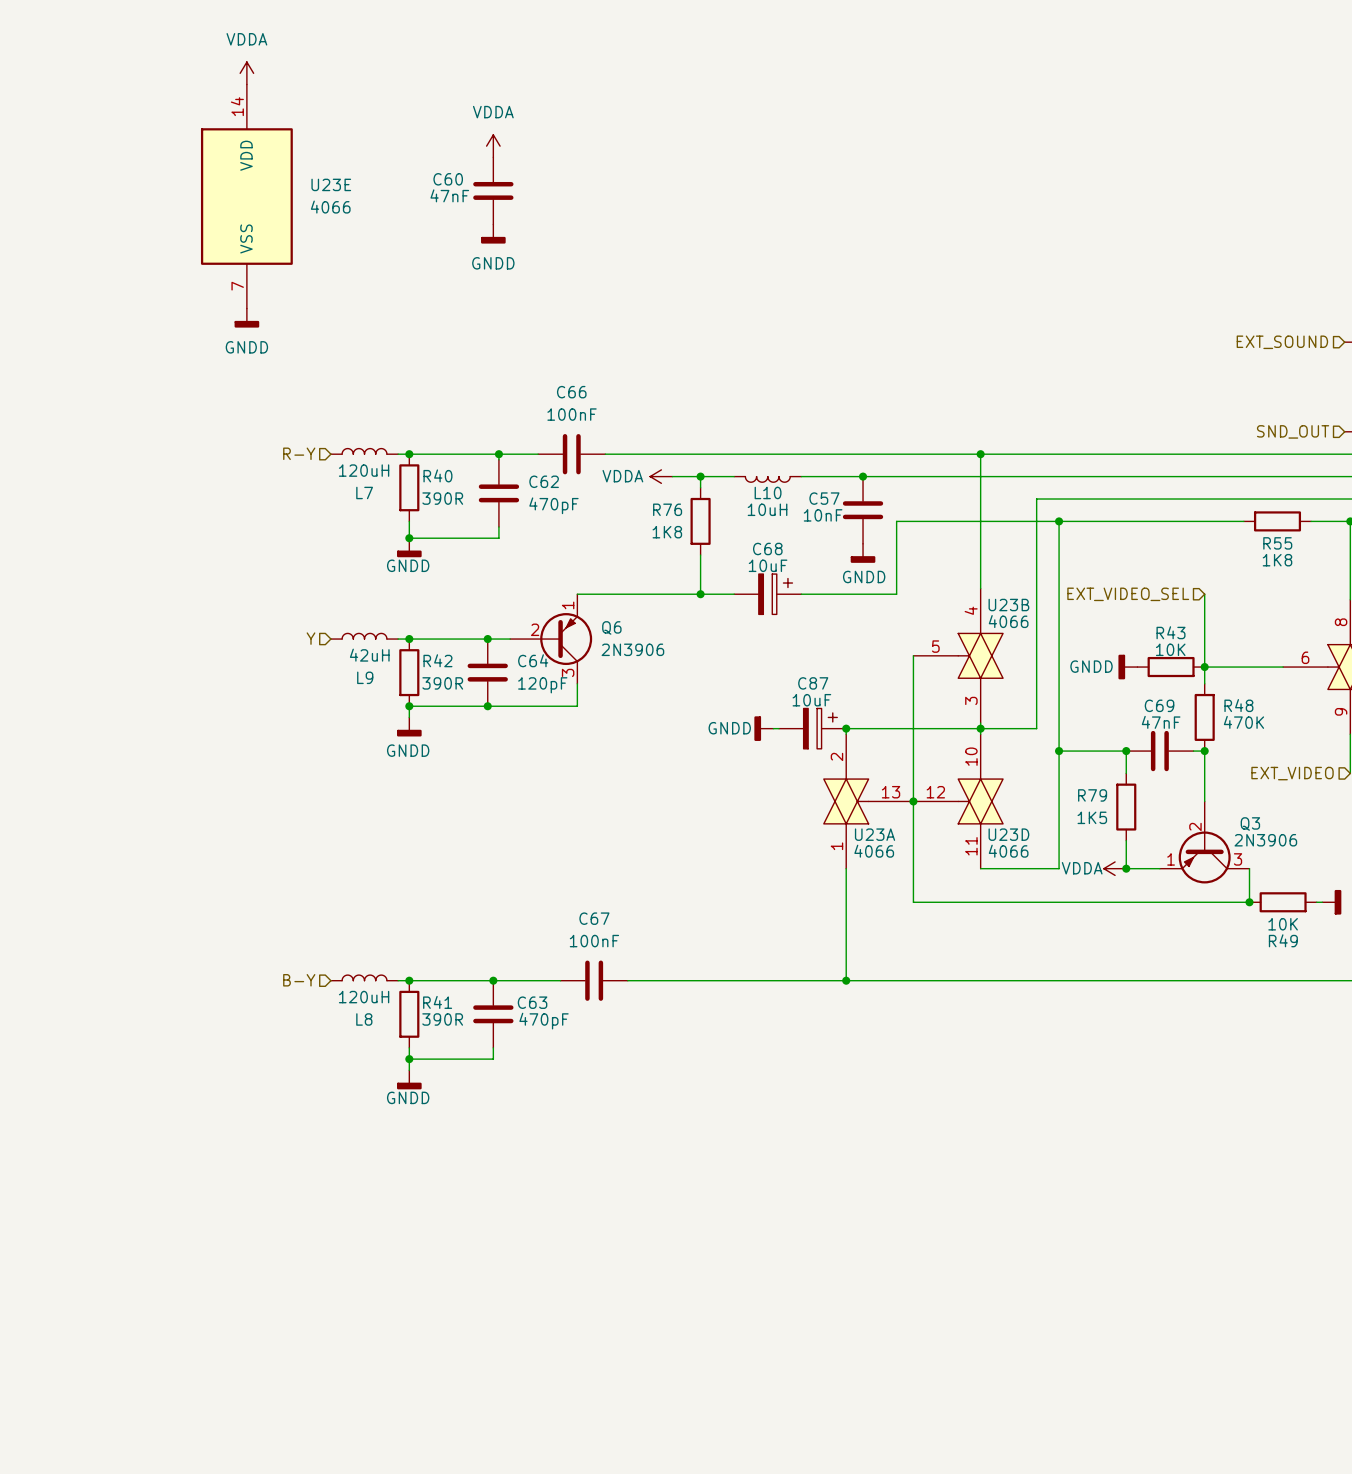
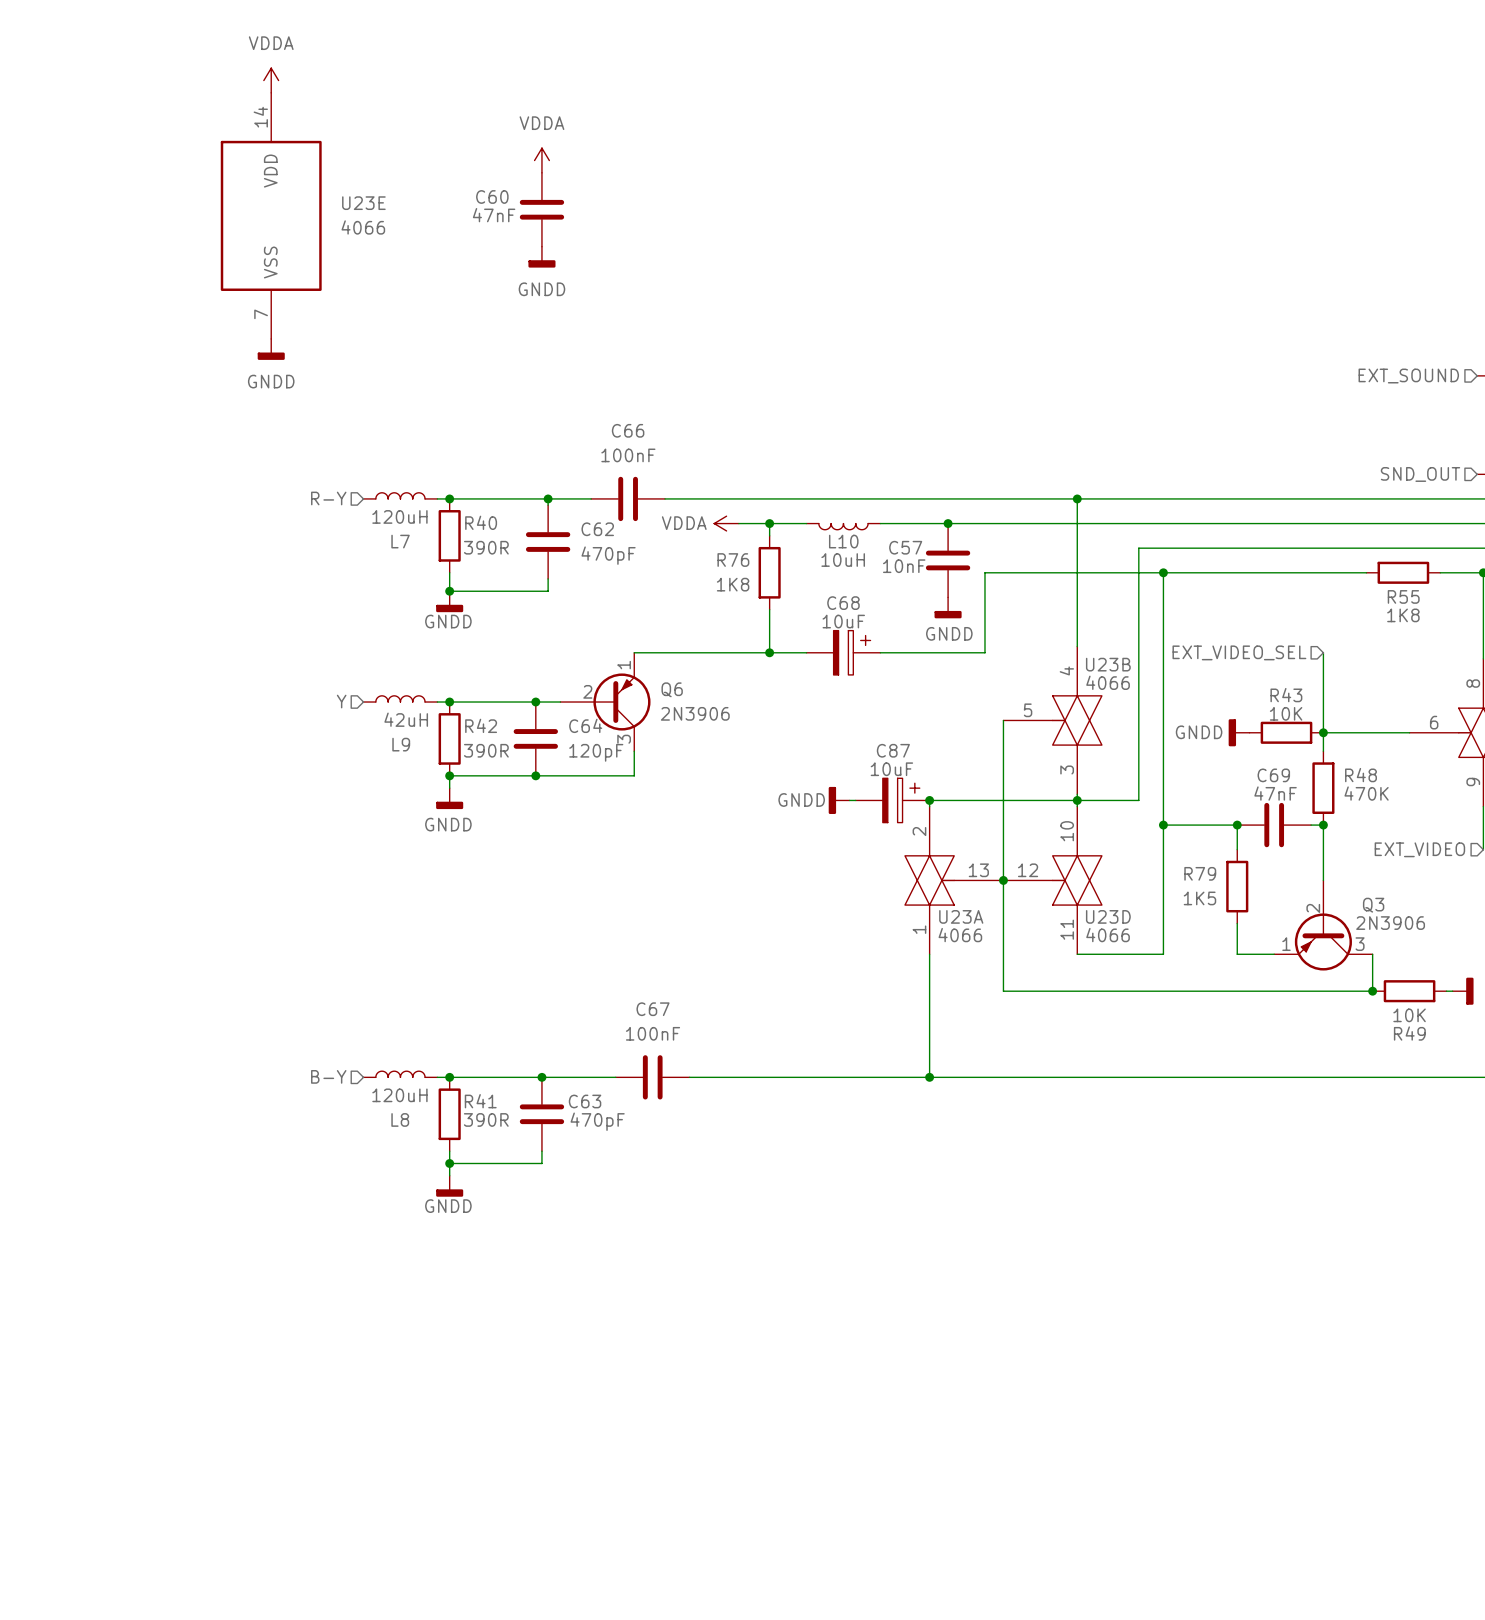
power symbol: VDDA (1115, 868) -> none
junction: (1126, 868) -> none

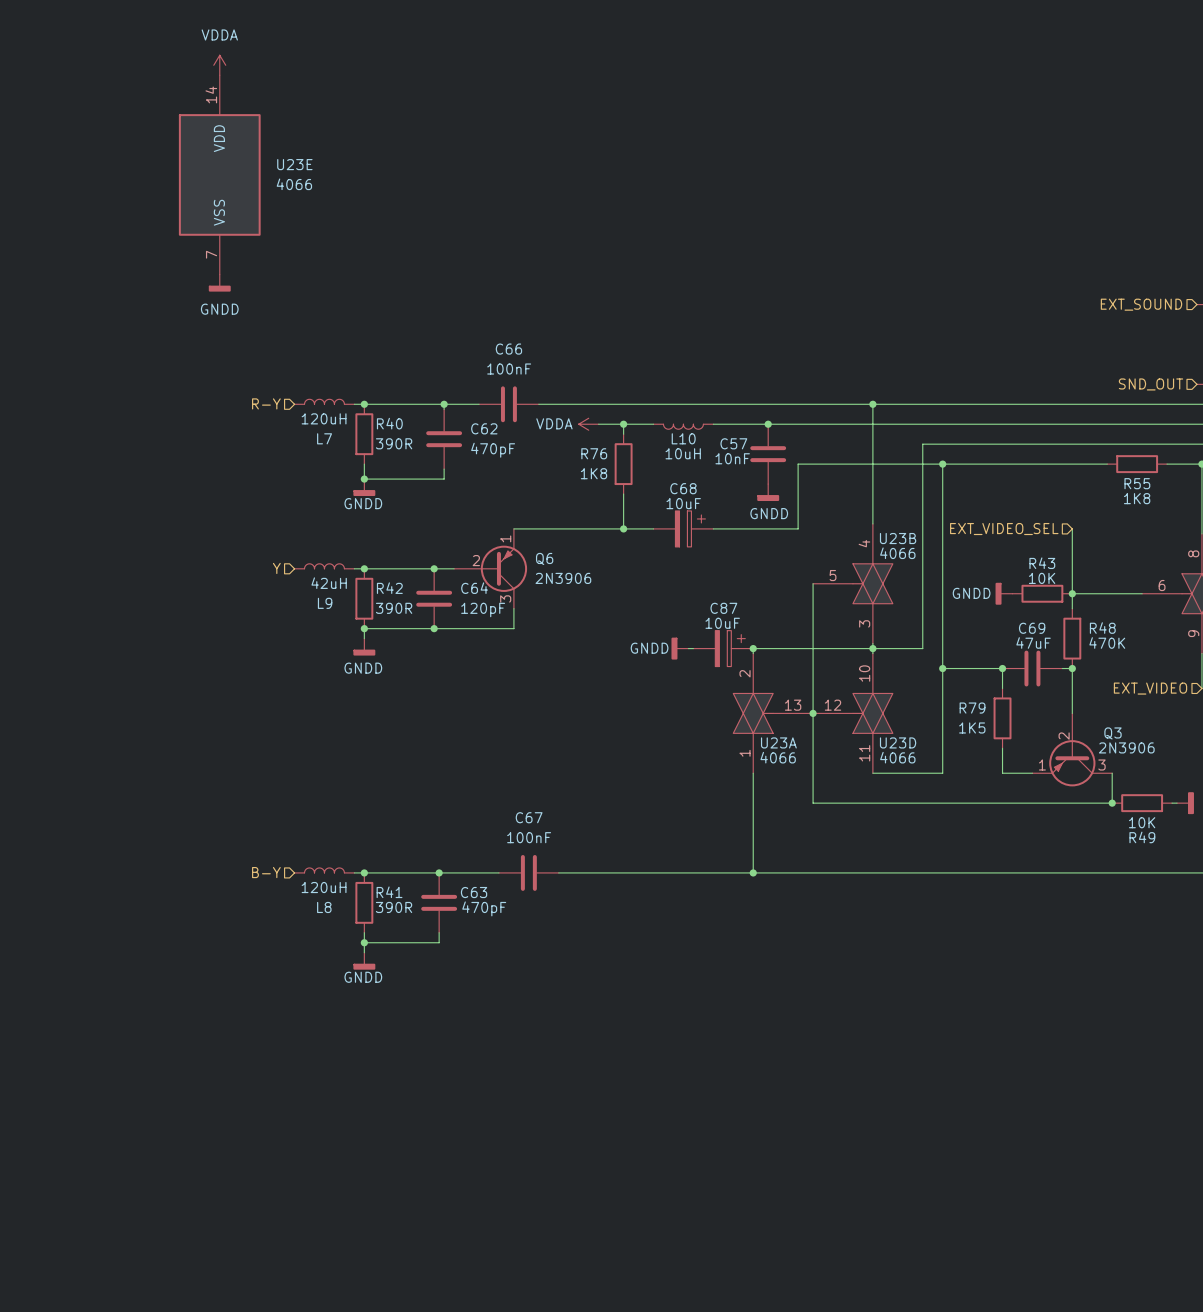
power symbol: VDDA (541, 160) -> none
C60: 47nF (541, 209) -> none
power symbol: GNDD (541, 257) -> none
C69 value: 47nF (1275, 793) -> 47uF (1033, 642)

